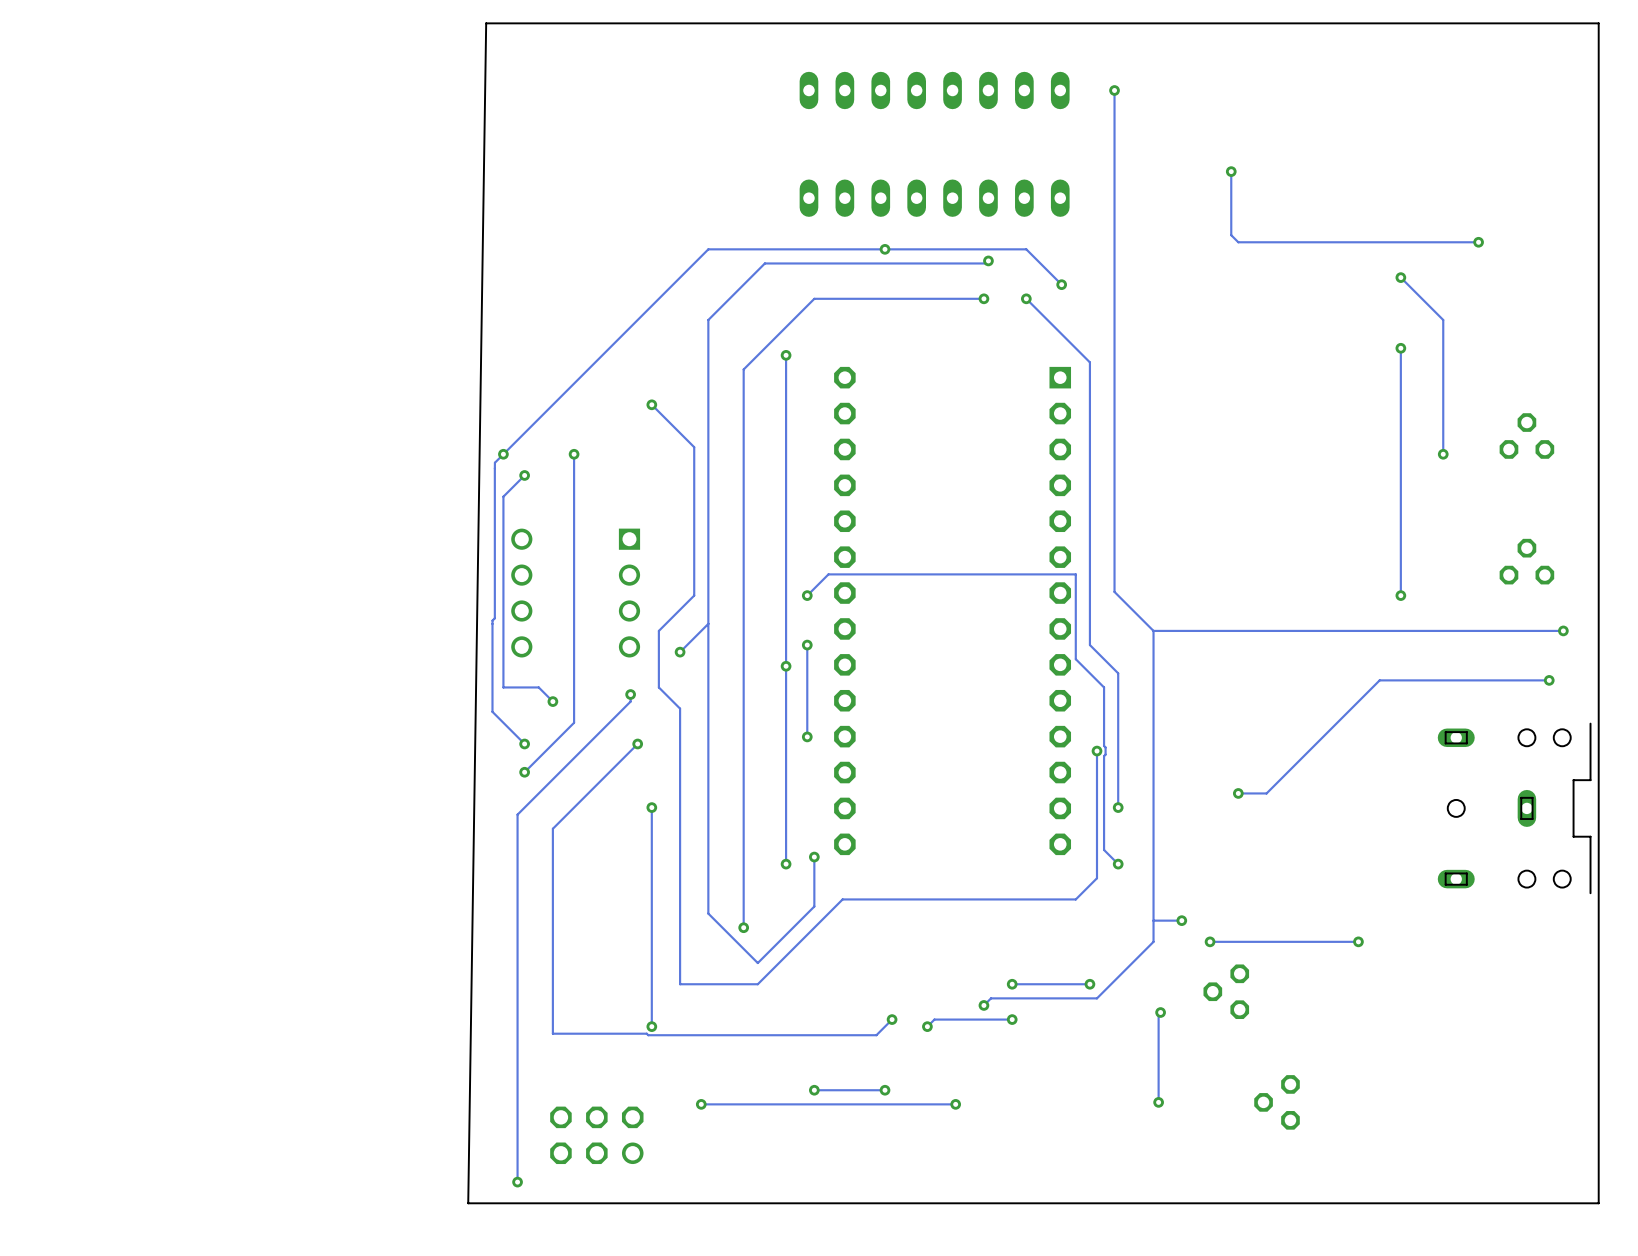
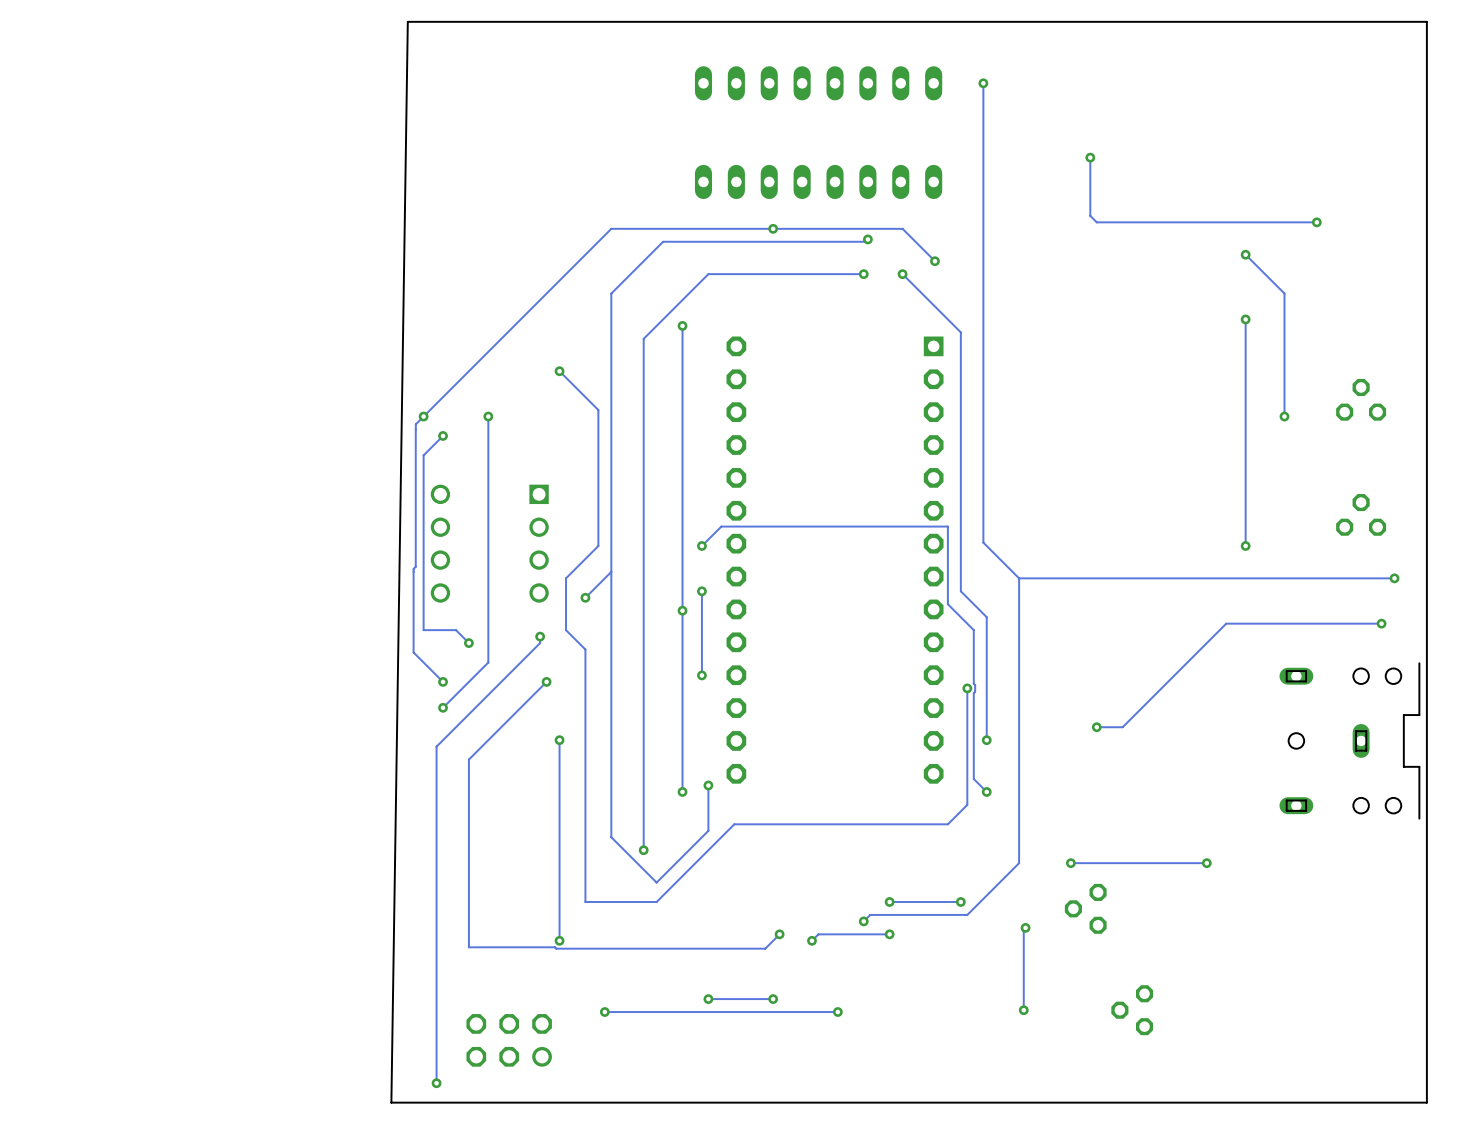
track: (1181, 920) (1153, 920) -> none
via: (1181, 920) -> none

